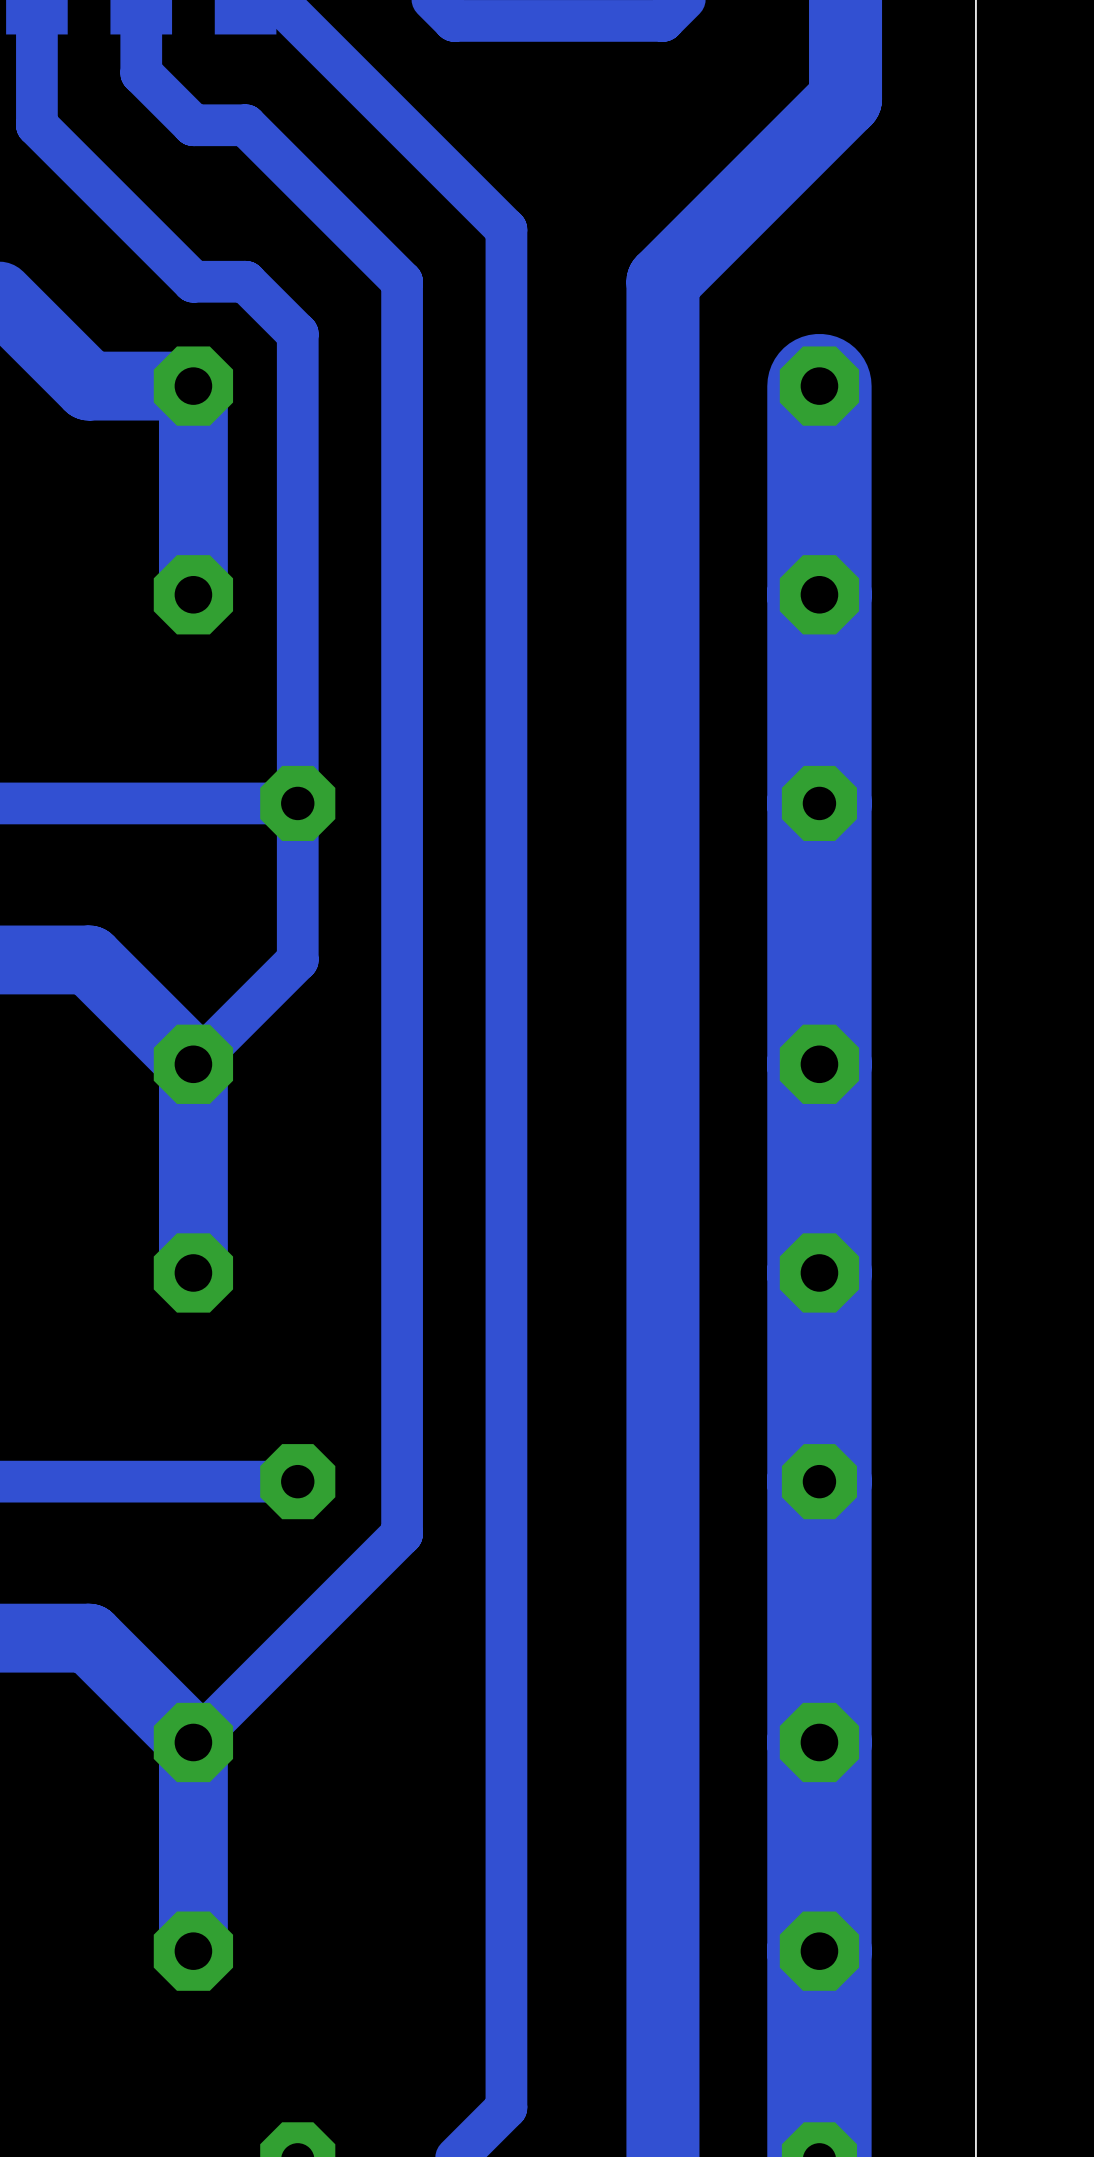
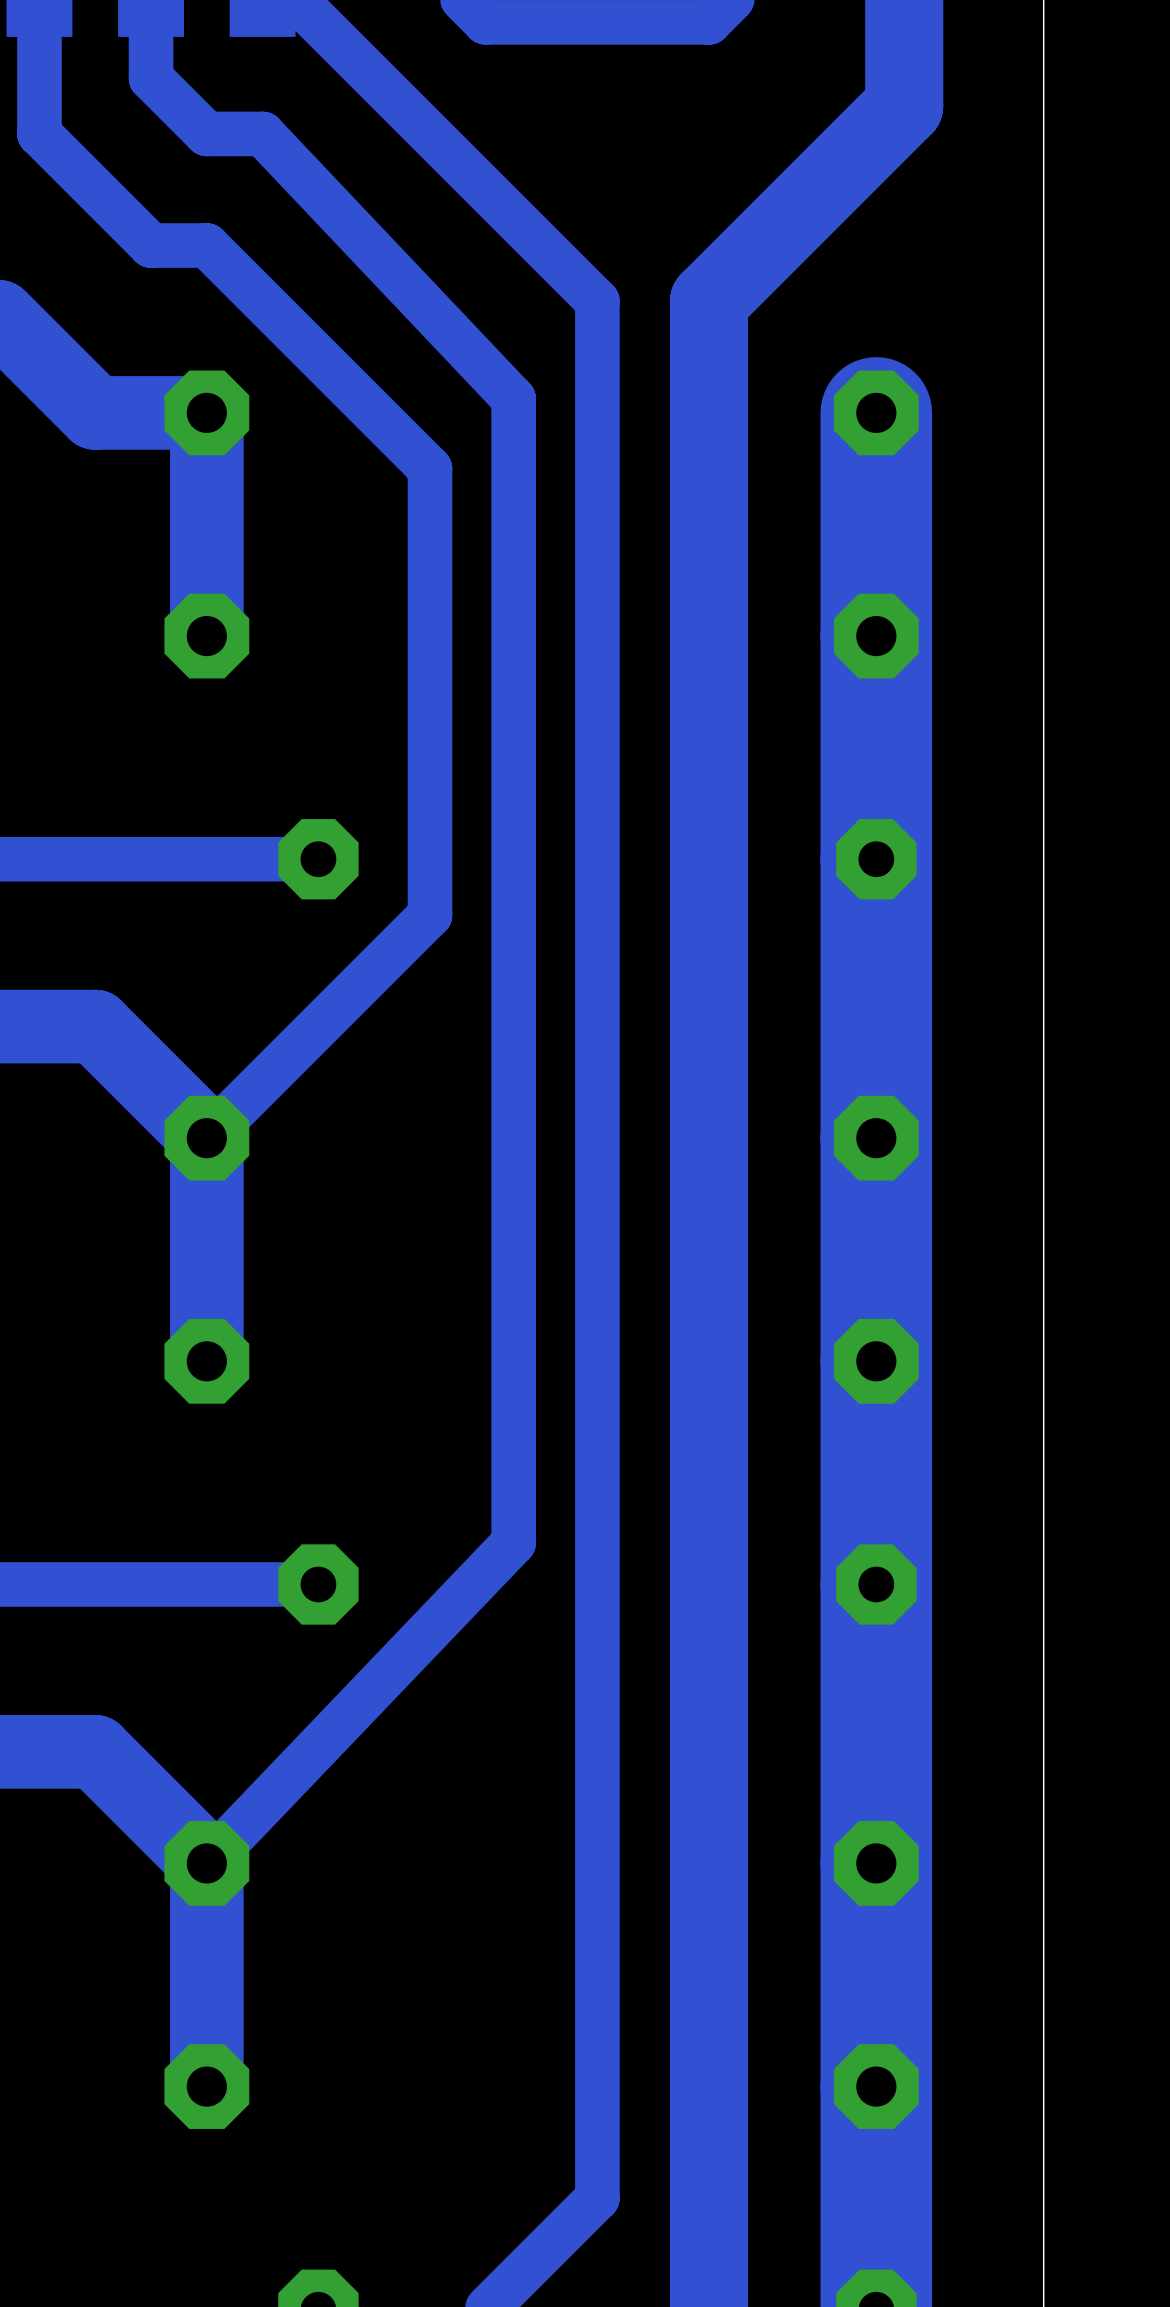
bottom track: (245, 125) (402, 281) (402, 438) -> (318, 357) (430, 468)
bottom track: (141, 229) (193, 281) (245, 281) -> (151, 245) (206, 245) (262, 301)
bottom track: (506, 229) (506, 2107) -> (541, 245) (597, 301) (597, 2198) (541, 2253)
bottom track: (297, 333) (297, 959) -> (430, 915) (318, 1026)
bottom track: (402, 855) (402, 1533) (193, 1742) -> (262, 133) (513, 398) (513, 1542) (206, 1863)

